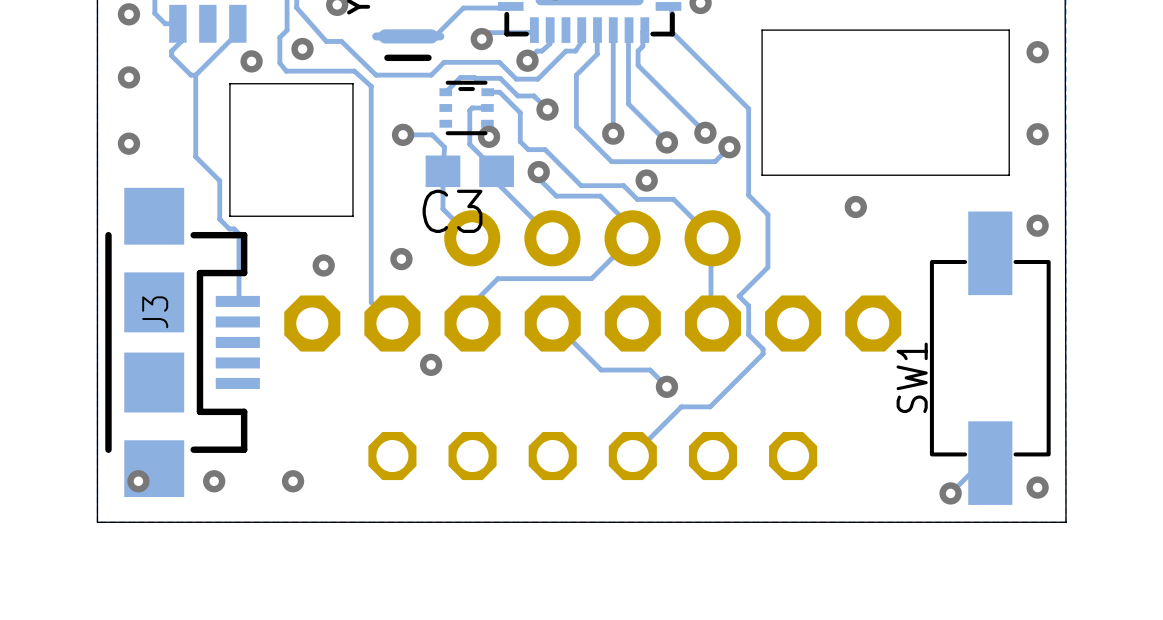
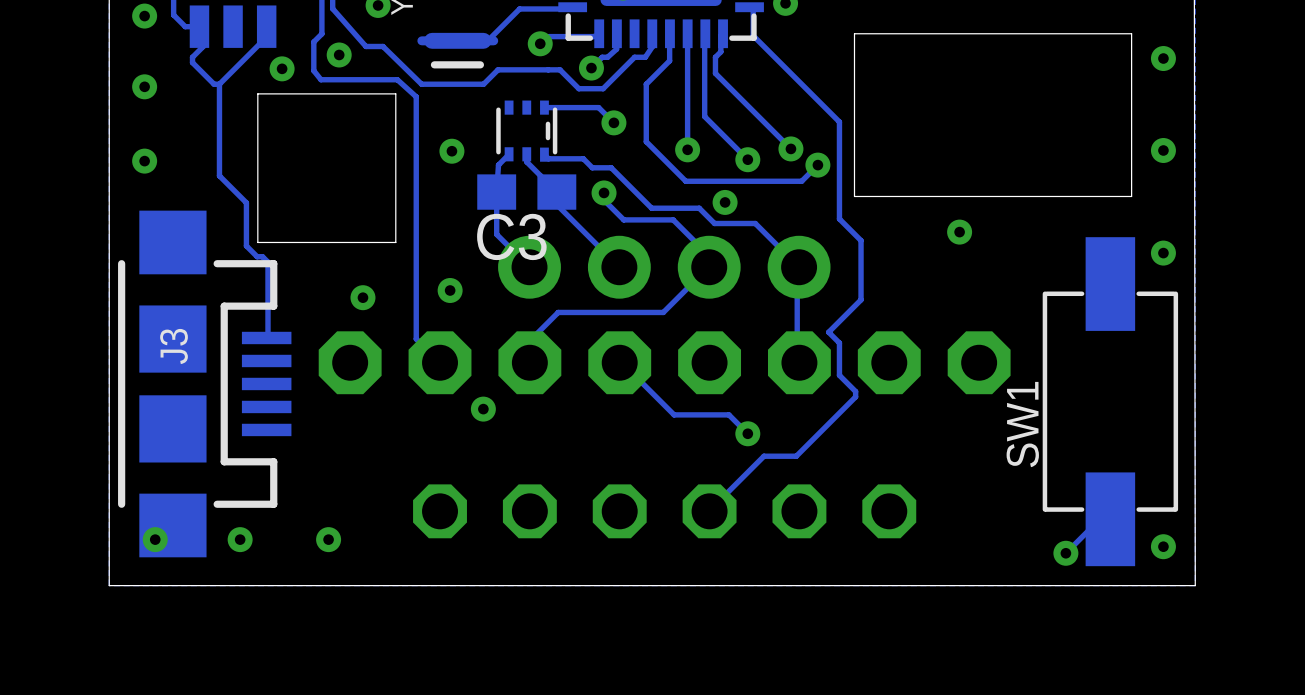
track: (445, 92) (460, 77) (500, 78) (517, 95) -> (544, 107) (580, 107)
track: (487, 92) (499, 92) (520, 112) (520, 141) -> (544, 154) (548, 158) (583, 158)
part rotation: 0° (466, 107) -> 90° clockwise (526, 131)
track: (487, 107) (472, 107) (469, 110) (469, 137) -> none
track: (403, 134) (432, 134) (444, 147) -> (509, 154) (498, 165)
via: (489, 136) -> none

